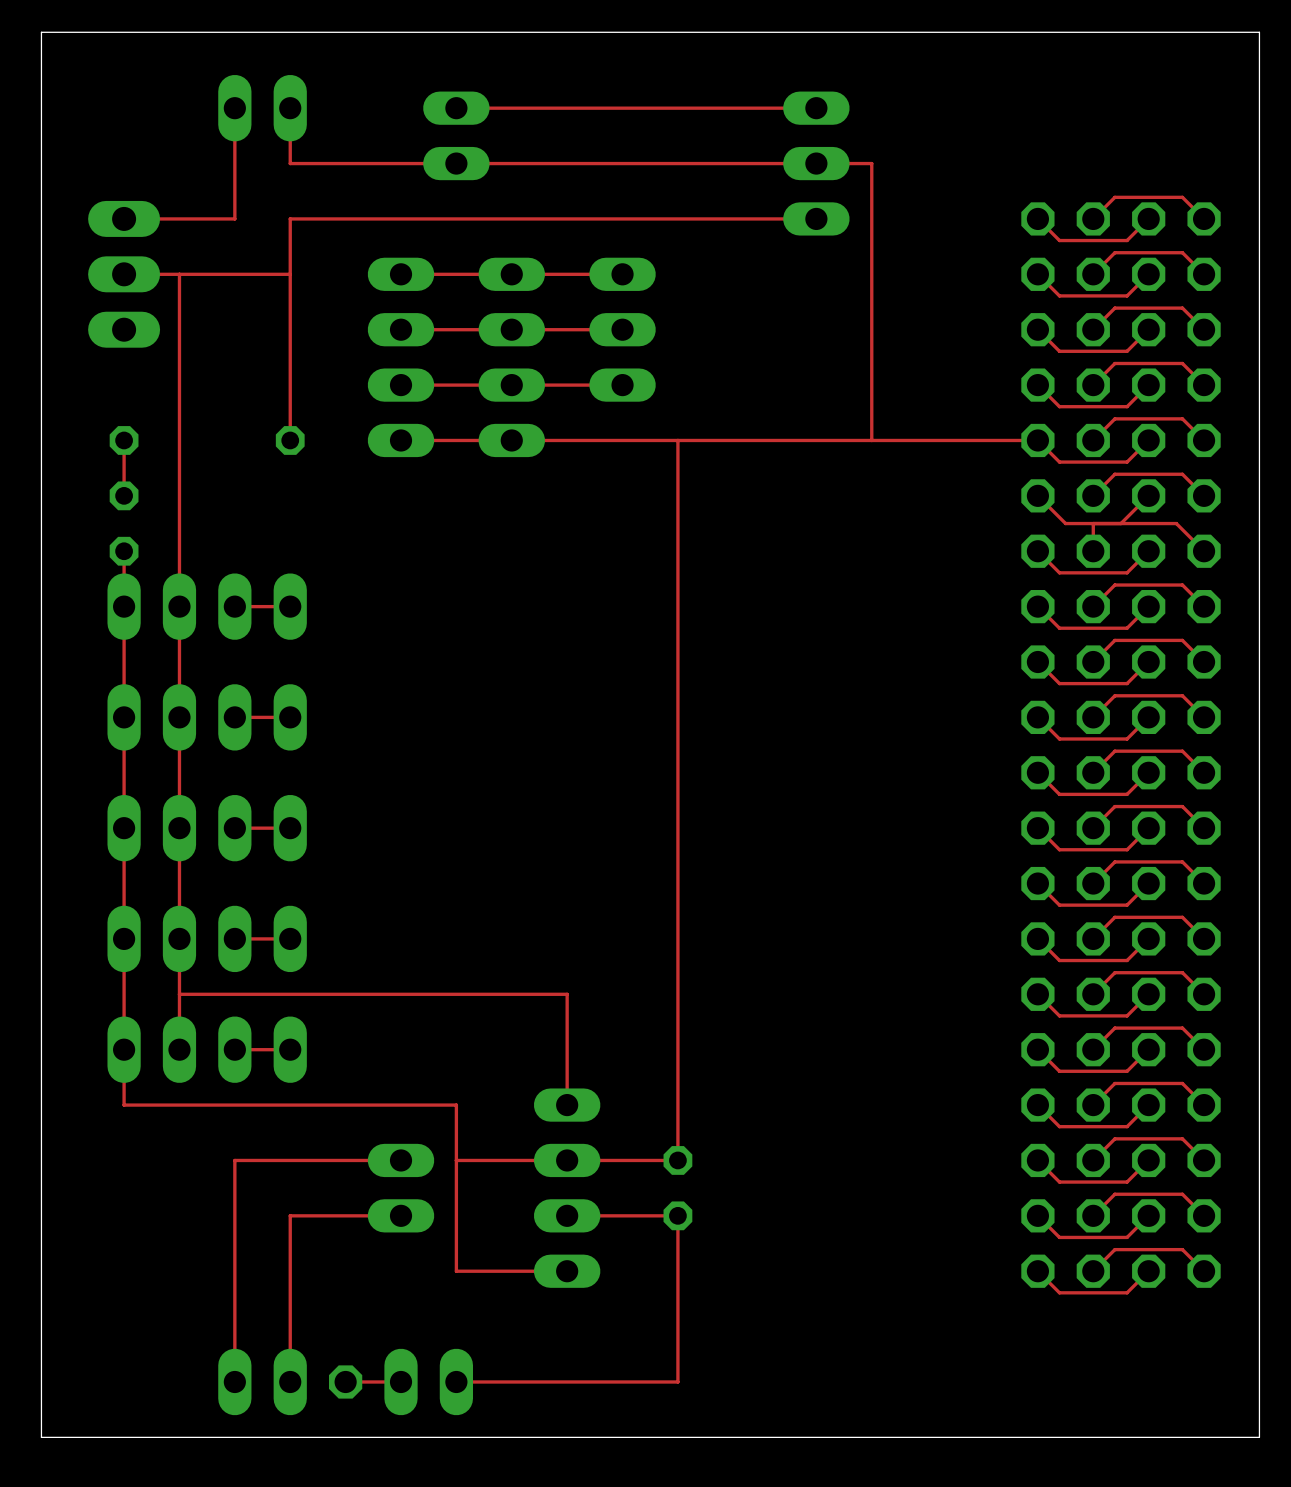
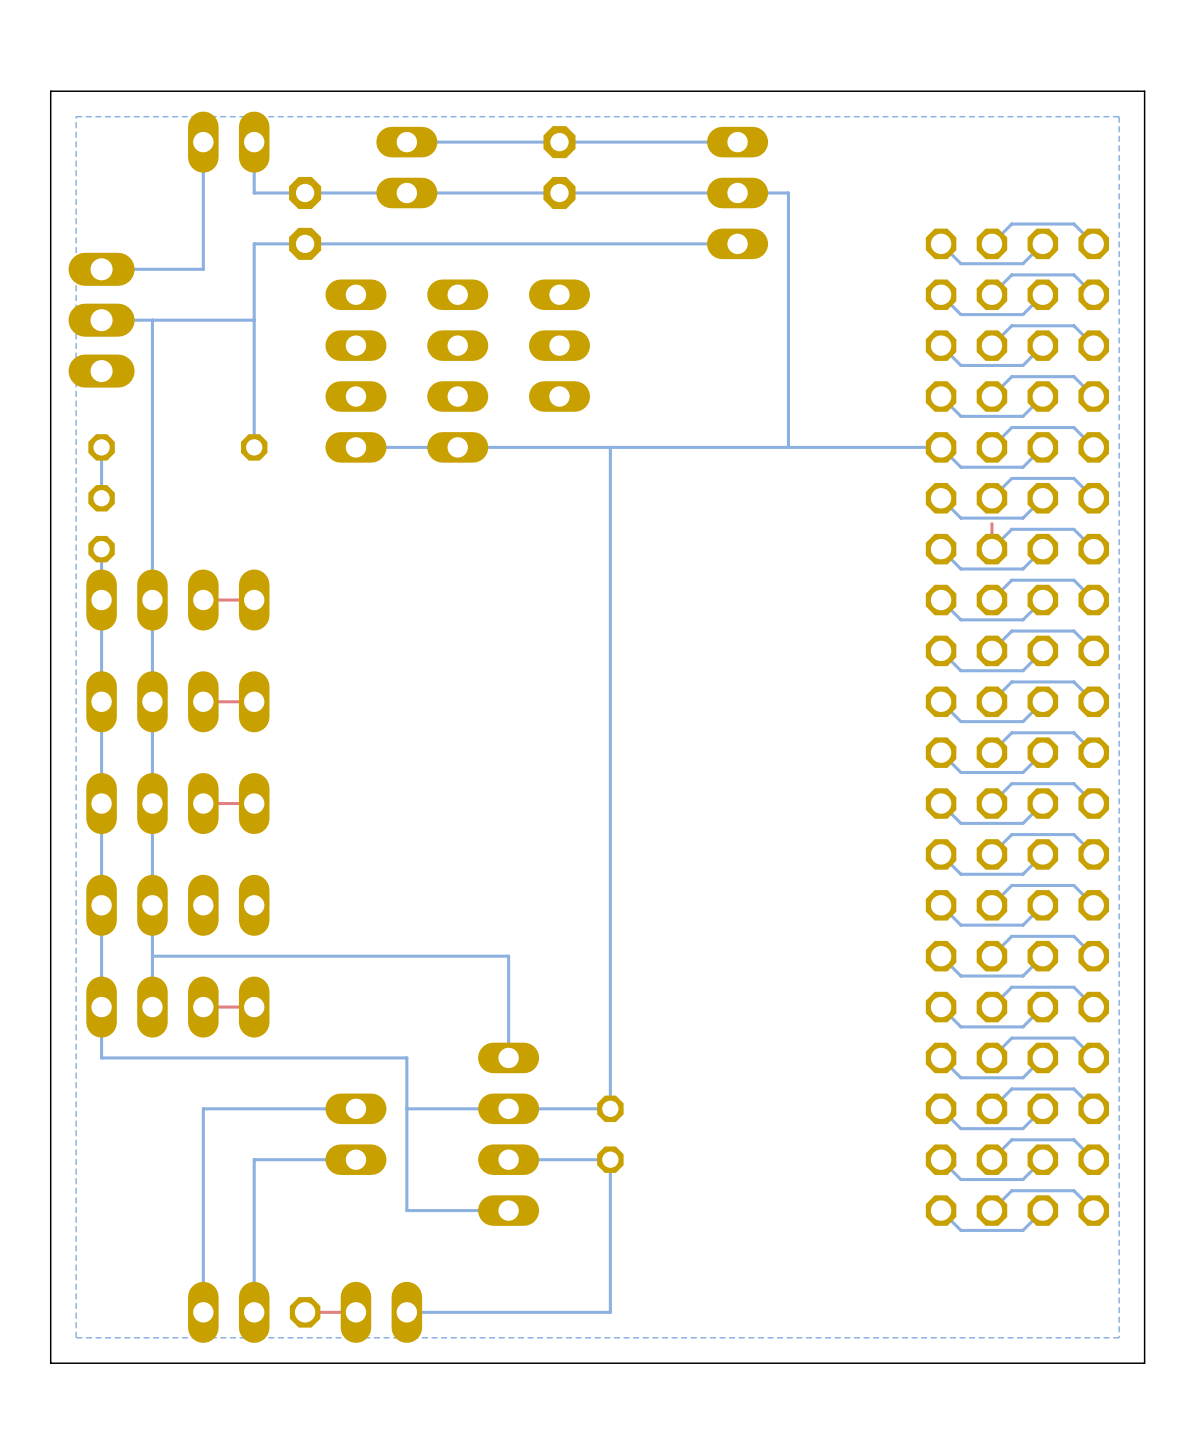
board edge: (1259, 52) (1259, 32) (41, 32) (41, 1437) (68, 1437) -> (1144, 91) (50, 91) (50, 1363)
bottom zone outline: none -> (1119, 116) (1119, 1337) (76, 1337) (76, 116) (1119, 116)
top track: (234, 108) (234, 218) (124, 218) -> none
bottom track: none -> (203, 142) (203, 269) (101, 269)
top track: (290, 108) (290, 163) (871, 163) (871, 440) -> none
bottom track: none -> (254, 142) (254, 192) (788, 192) (788, 447)
part: none -> (559, 142)
top track: (816, 108) (456, 108) -> none
bottom track: none -> (737, 142) (406, 142)
part: none -> (305, 192)
part: none -> (559, 192)
part: none -> (305, 243)
top track: (816, 218) (290, 218) (290, 440) -> none
bottom track: none -> (737, 243) (254, 243) (254, 447)
top track: (1148, 218) (1127, 240) (1059, 240) (1037, 218) -> none
bottom track: none -> (1042, 243) (1023, 263) (960, 263) (941, 243)
top track: (1204, 218) (1182, 197) (1114, 197) (1093, 218) -> none
bottom track: none -> (1093, 243) (1073, 224) (1011, 224) (991, 243)
part position: (124, 274) -> (101, 320)
top track: (179, 274) (179, 1049) -> none
top track: (290, 274) (124, 274) -> none
top track: (622, 274) (401, 274) -> none
top track: (1148, 274) (1127, 295) (1059, 295) (1037, 274) -> none
bottom track: none -> (1042, 294) (1023, 314) (960, 314) (941, 294)
top track: (1204, 274) (1182, 252) (1114, 252) (1093, 274) -> none
bottom track: none -> (1093, 294) (1073, 274) (1011, 274) (991, 294)
bottom track: none -> (152, 320) (152, 1007)
bottom track: none -> (254, 320) (101, 320)
top track: (622, 329) (401, 329) -> none
top track: (1148, 329) (1127, 351) (1059, 351) (1037, 329) -> none
bottom track: none -> (1042, 345) (1023, 365) (960, 365) (941, 345)
top track: (1204, 329) (1182, 308) (1114, 308) (1093, 329) -> none
bottom track: none -> (1093, 345) (1073, 325) (1011, 325) (991, 345)
top track: (622, 385) (401, 385) -> none
top track: (1148, 385) (1127, 406) (1059, 406) (1037, 385) -> none
bottom track: none -> (1042, 396) (1023, 416) (960, 416) (941, 396)
top track: (1204, 385) (1182, 363) (1114, 363) (1093, 385) -> none
bottom track: none -> (1093, 396) (1073, 376) (1011, 376) (991, 396)
top track: (124, 440) (124, 495) -> none
bottom track: none -> (101, 447) (101, 498)
top track: (677, 440) (677, 1160) (456, 1160) -> none
bottom track: none -> (610, 447) (610, 1108) (406, 1108)
top track: (1148, 440) (1127, 462) (1059, 462) (1037, 440) (401, 440) -> none
bottom track: none -> (1042, 447) (1023, 467) (960, 467) (941, 447) (355, 447)
top track: (1204, 440) (1182, 418) (1114, 418) (1093, 440) -> none
bottom track: none -> (1093, 447) (1073, 427) (1011, 427) (991, 447)
top track: (1037, 495) (1065, 523) (1176, 523) (1204, 551) -> none
top track: (1148, 495) (1120, 523) -> none
bottom track: none -> (1042, 498) (1023, 518) (960, 518) (941, 498)
top track: (1204, 495) (1182, 474) (1114, 474) (1093, 495) -> none
bottom track: none -> (1093, 498) (1073, 478) (1011, 478) (991, 498)
top track: (124, 551) (124, 1105) (456, 1105) (456, 1271) (567, 1271) -> none
bottom track: none -> (101, 549) (101, 1057) (406, 1057) (406, 1210) (508, 1210)
top track: (1148, 551) (1127, 572) (1059, 572) (1037, 551) -> none
bottom track: none -> (1042, 549) (1023, 568) (960, 568) (941, 549)
bottom track: none -> (1093, 549) (1073, 529) (1011, 529) (991, 549)
top track: (1148, 606) (1127, 628) (1059, 628) (1037, 606) -> none
bottom track: none -> (1042, 600) (1023, 619) (960, 619) (941, 600)
top track: (1204, 606) (1182, 585) (1114, 585) (1093, 606) -> none
bottom track: none -> (1093, 600) (1073, 580) (1011, 580) (991, 600)
top track: (1148, 662) (1127, 683) (1059, 683) (1037, 662) -> none
bottom track: none -> (1042, 650) (1023, 670) (960, 670) (941, 650)
top track: (1204, 662) (1182, 640) (1114, 640) (1093, 662) -> none
bottom track: none -> (1093, 650) (1073, 631) (1011, 631) (991, 650)
top track: (1148, 717) (1127, 738) (1059, 738) (1037, 717) -> none
bottom track: none -> (1042, 701) (1023, 721) (960, 721) (941, 701)
top track: (1204, 717) (1182, 695) (1114, 695) (1093, 717) -> none
bottom track: none -> (1093, 701) (1073, 681) (1011, 681) (991, 701)
top track: (1148, 772) (1127, 794) (1059, 794) (1037, 772) -> none
bottom track: none -> (1042, 752) (1023, 772) (960, 772) (941, 752)
top track: (1204, 772) (1182, 751) (1114, 751) (1093, 772) -> none
bottom track: none -> (1093, 752) (1073, 732) (1011, 732) (991, 752)
top track: (1148, 828) (1127, 849) (1059, 849) (1037, 828) -> none
bottom track: none -> (1042, 803) (1023, 823) (960, 823) (941, 803)
top track: (1204, 828) (1182, 806) (1114, 806) (1093, 828) -> none
bottom track: none -> (1093, 803) (1073, 783) (1011, 783) (991, 803)
top track: (1148, 883) (1127, 905) (1059, 905) (1037, 883) -> none
bottom track: none -> (1042, 854) (1023, 874) (960, 874) (941, 854)
top track: (1204, 883) (1182, 861) (1114, 861) (1093, 883) -> none
bottom track: none -> (1093, 854) (1073, 834) (1011, 834) (991, 854)
top track: (290, 938) (234, 938) -> none
top track: (1148, 938) (1127, 960) (1059, 960) (1037, 938) -> none
bottom track: none -> (1042, 905) (1023, 925) (960, 925) (941, 905)
top track: (1204, 938) (1182, 917) (1114, 917) (1093, 938) -> none
bottom track: none -> (1093, 905) (1073, 885) (1011, 885) (991, 905)
top track: (179, 994) (567, 994) (567, 1105) -> none
bottom track: none -> (152, 956) (508, 956) (508, 1057)
top track: (1148, 994) (1127, 1015) (1059, 1015) (1037, 994) -> none
bottom track: none -> (1042, 956) (1023, 976) (960, 976) (941, 956)
top track: (1204, 994) (1182, 972) (1114, 972) (1093, 994) -> none
bottom track: none -> (1093, 956) (1073, 936) (1011, 936) (991, 956)
top track: (1148, 1049) (1127, 1071) (1059, 1071) (1037, 1049) -> none
bottom track: none -> (1042, 1007) (1023, 1026) (960, 1026) (941, 1007)
top track: (1204, 1049) (1182, 1028) (1114, 1028) (1093, 1049) -> none
bottom track: none -> (1093, 1007) (1073, 987) (1011, 987) (991, 1007)
top track: (1148, 1105) (1127, 1126) (1059, 1126) (1037, 1105) -> none
bottom track: none -> (1042, 1057) (1023, 1077) (960, 1077) (941, 1057)
top track: (1204, 1105) (1182, 1083) (1114, 1083) (1093, 1105) -> none
bottom track: none -> (1093, 1057) (1073, 1038) (1011, 1038) (991, 1057)
top track: (401, 1160) (234, 1160) (234, 1381) -> none
bottom track: none -> (355, 1108) (203, 1108) (203, 1312)
top track: (1148, 1160) (1127, 1182) (1059, 1182) (1037, 1160) -> none
bottom track: none -> (1042, 1108) (1023, 1128) (960, 1128) (941, 1108)
top track: (1204, 1160) (1182, 1138) (1114, 1138) (1093, 1160) -> none
bottom track: none -> (1093, 1108) (1073, 1088) (1011, 1088) (991, 1108)
top track: (401, 1215) (290, 1215) (290, 1381) -> none
bottom track: none -> (355, 1159) (254, 1159) (254, 1312)
top track: (567, 1215) (677, 1215) (677, 1381) (456, 1381) -> none
bottom track: none -> (508, 1159) (610, 1159) (610, 1312) (406, 1312)
top track: (1148, 1215) (1127, 1237) (1059, 1237) (1037, 1215) -> none
bottom track: none -> (1042, 1159) (1023, 1179) (960, 1179) (941, 1159)
top track: (1204, 1215) (1182, 1194) (1114, 1194) (1093, 1215) -> none
bottom track: none -> (1093, 1159) (1073, 1139) (1011, 1139) (991, 1159)
top track: (1148, 1271) (1127, 1292) (1059, 1292) (1037, 1271) -> none
bottom track: none -> (1042, 1210) (1023, 1230) (960, 1230) (941, 1210)
top track: (1204, 1271) (1182, 1249) (1114, 1249) (1093, 1271) -> none
bottom track: none -> (1093, 1210) (1073, 1190) (1011, 1190) (991, 1210)

